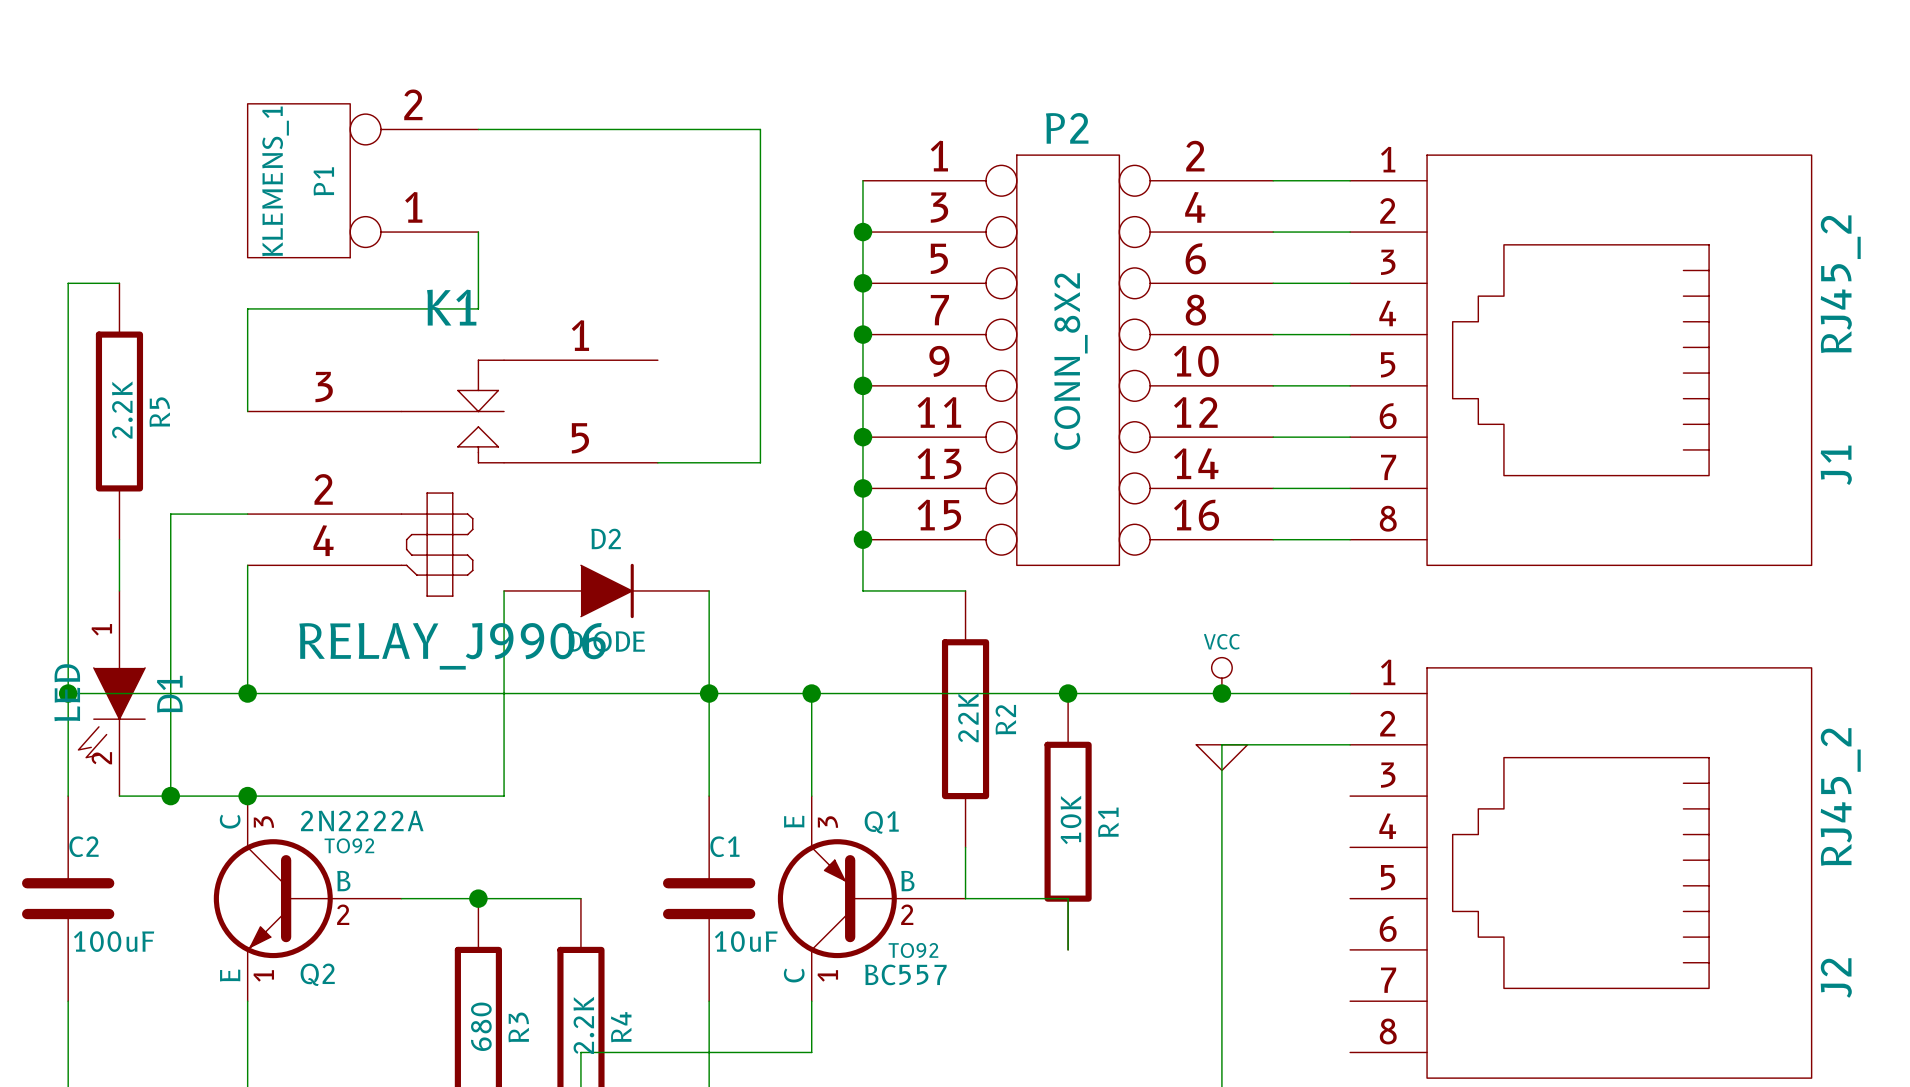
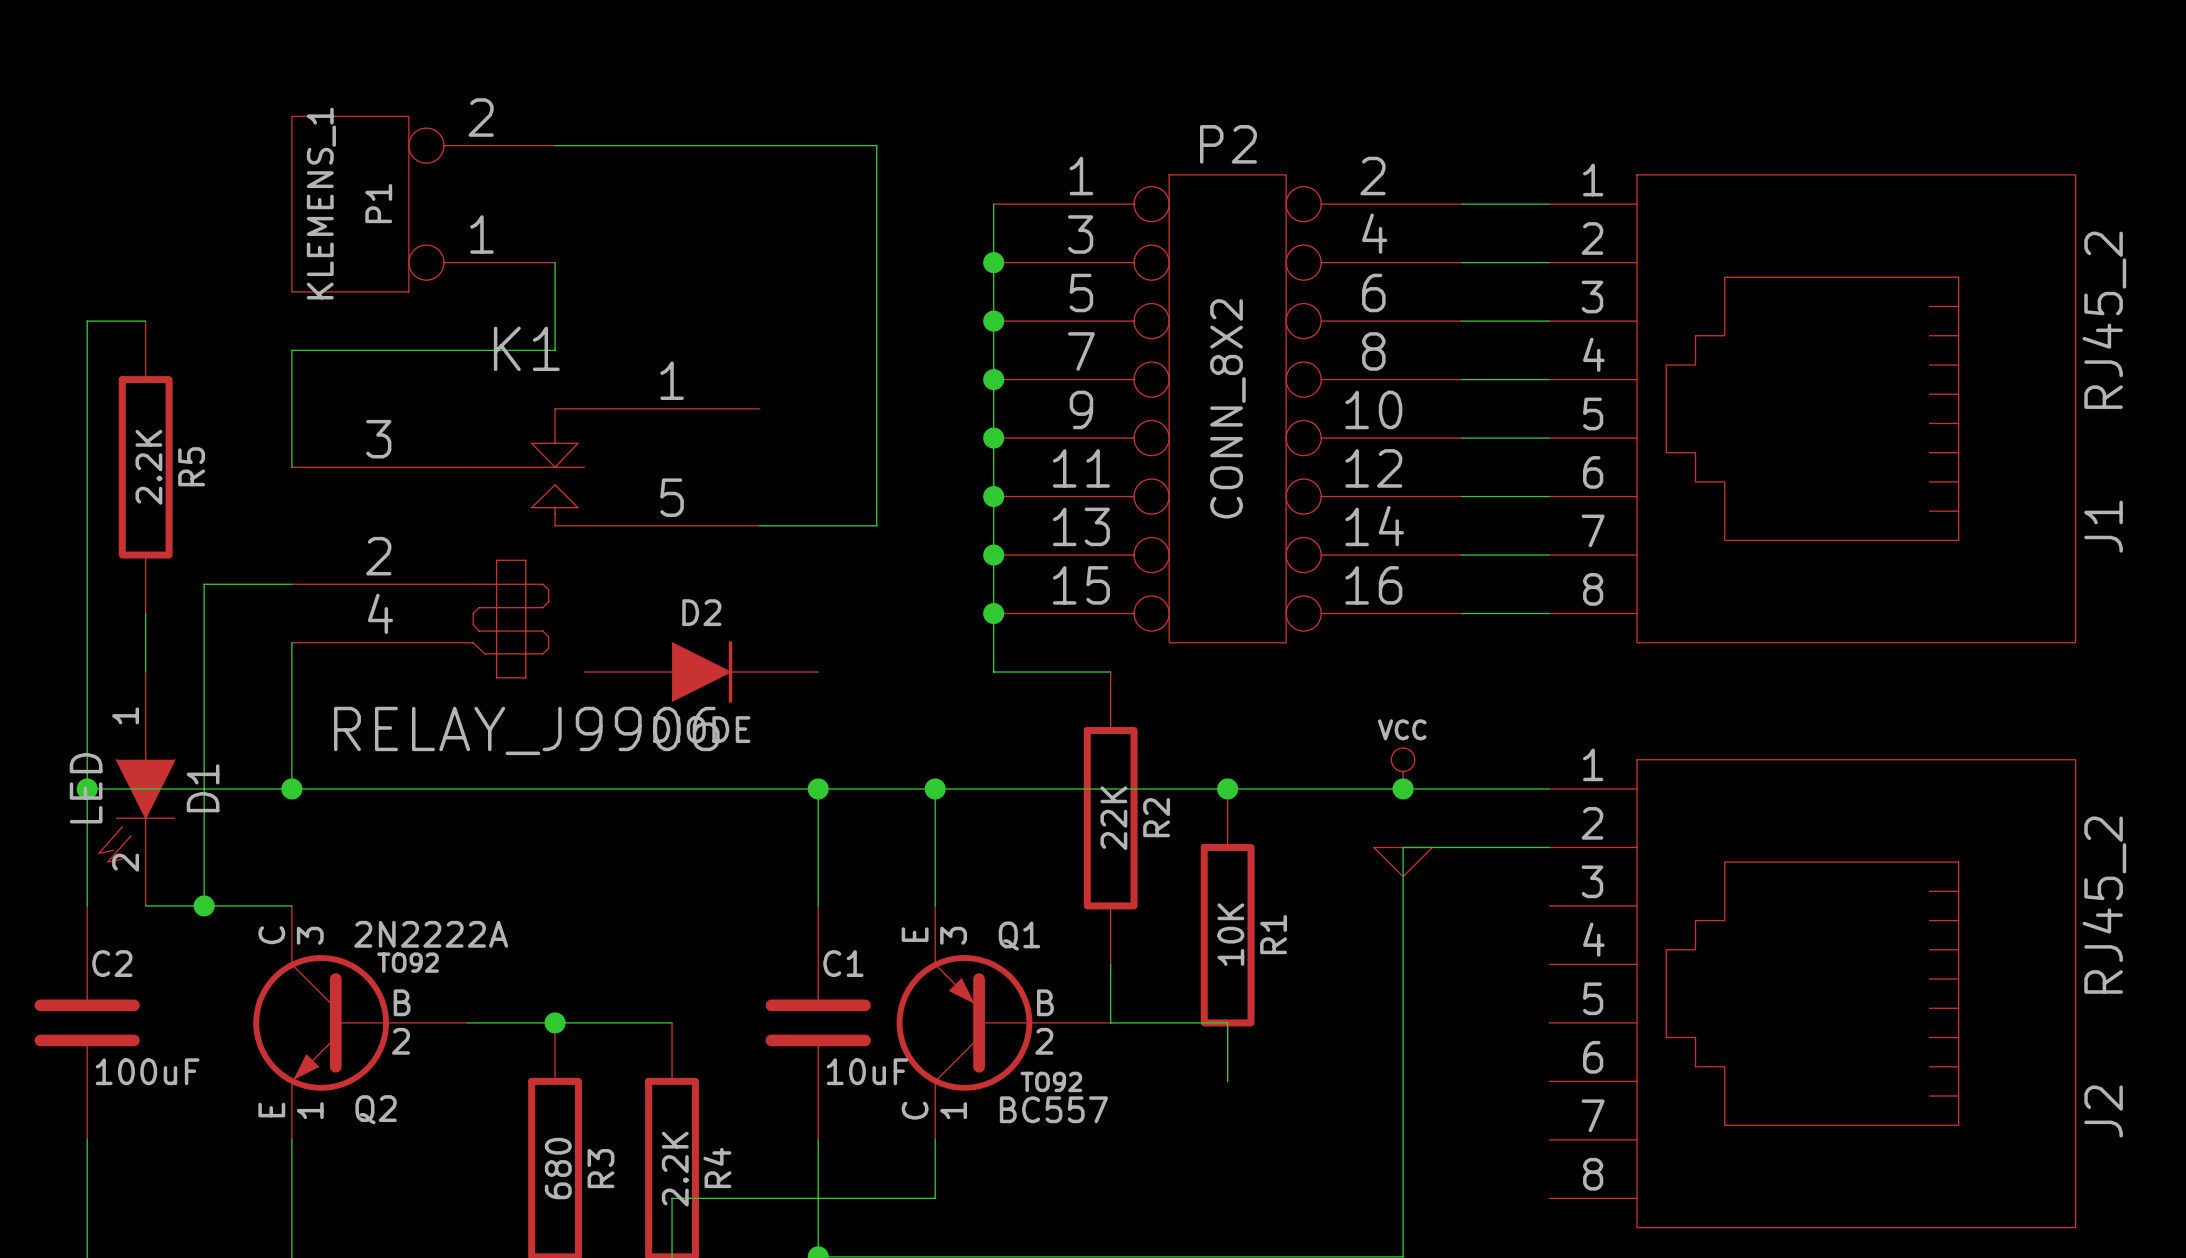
wire: (504, 590) (504, 796) (247, 796) -> none
wire: (709, 590) (709, 693) -> none
junction: (247, 796) -> none

